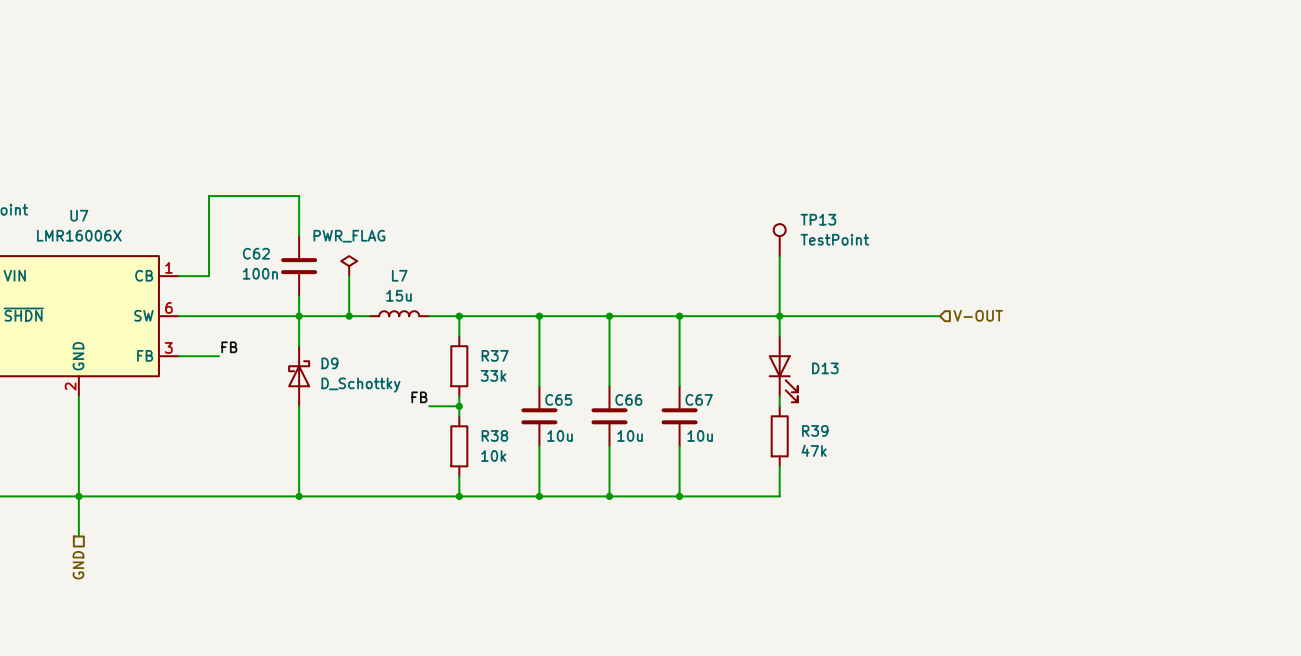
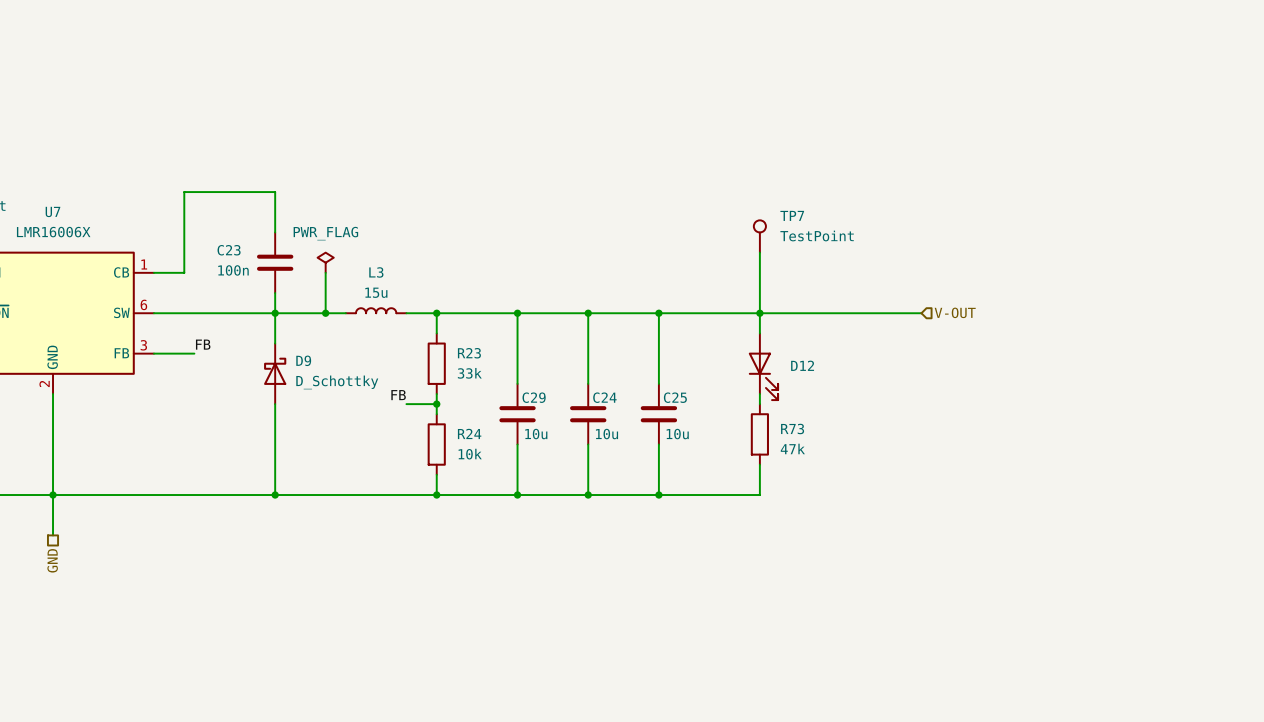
TP13 name: TP13 (818, 219) -> TP7 (792, 215)
C62 name: C62 (256, 253) -> C23 (229, 250)
L7 name: L7 (399, 275) -> L3 (376, 272)
R37 name: R37 (495, 355) -> R23 (469, 353)
D13 name: D13 (825, 368) -> D12 (802, 365)
C65 name: C65 (558, 399) -> C29 (534, 397)
C66 name: C66 (628, 399) -> C24 (604, 397)
C67 name: C67 (699, 399) -> C25 (675, 397)
R39 name: R39 (815, 430) -> R73 (792, 428)
R38 name: R38 (494, 435) -> R24 (469, 433)

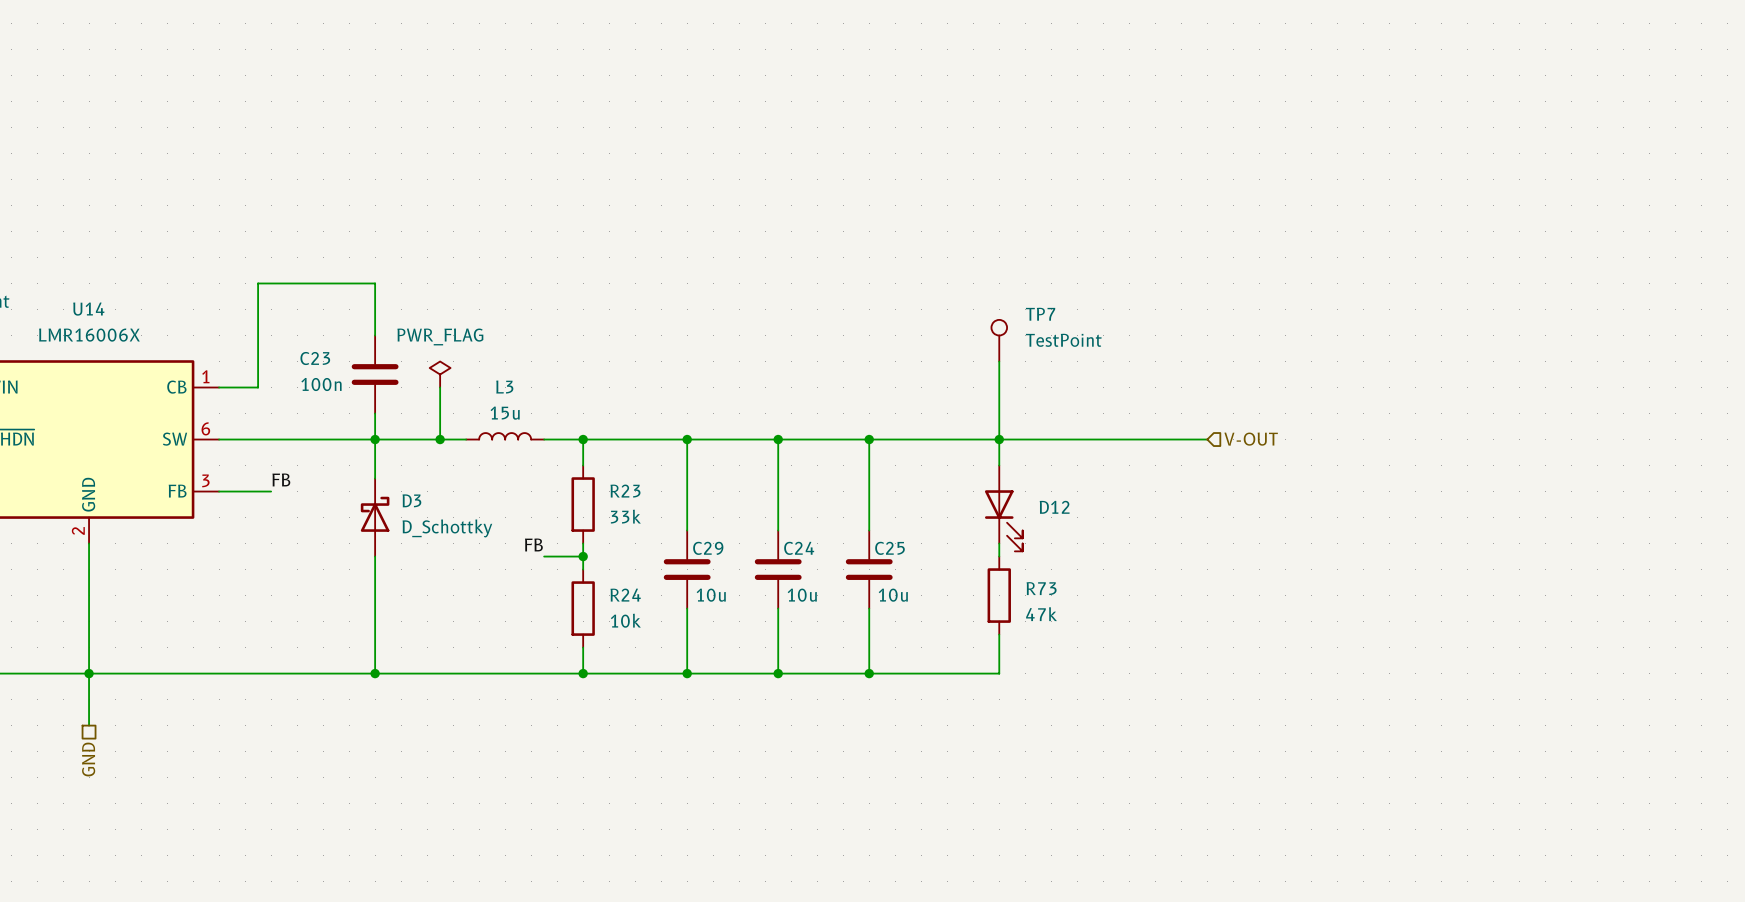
U7 name: U7 (52, 211) -> U14 (88, 309)
D9 name: D9 (303, 360) -> D3 (411, 500)

